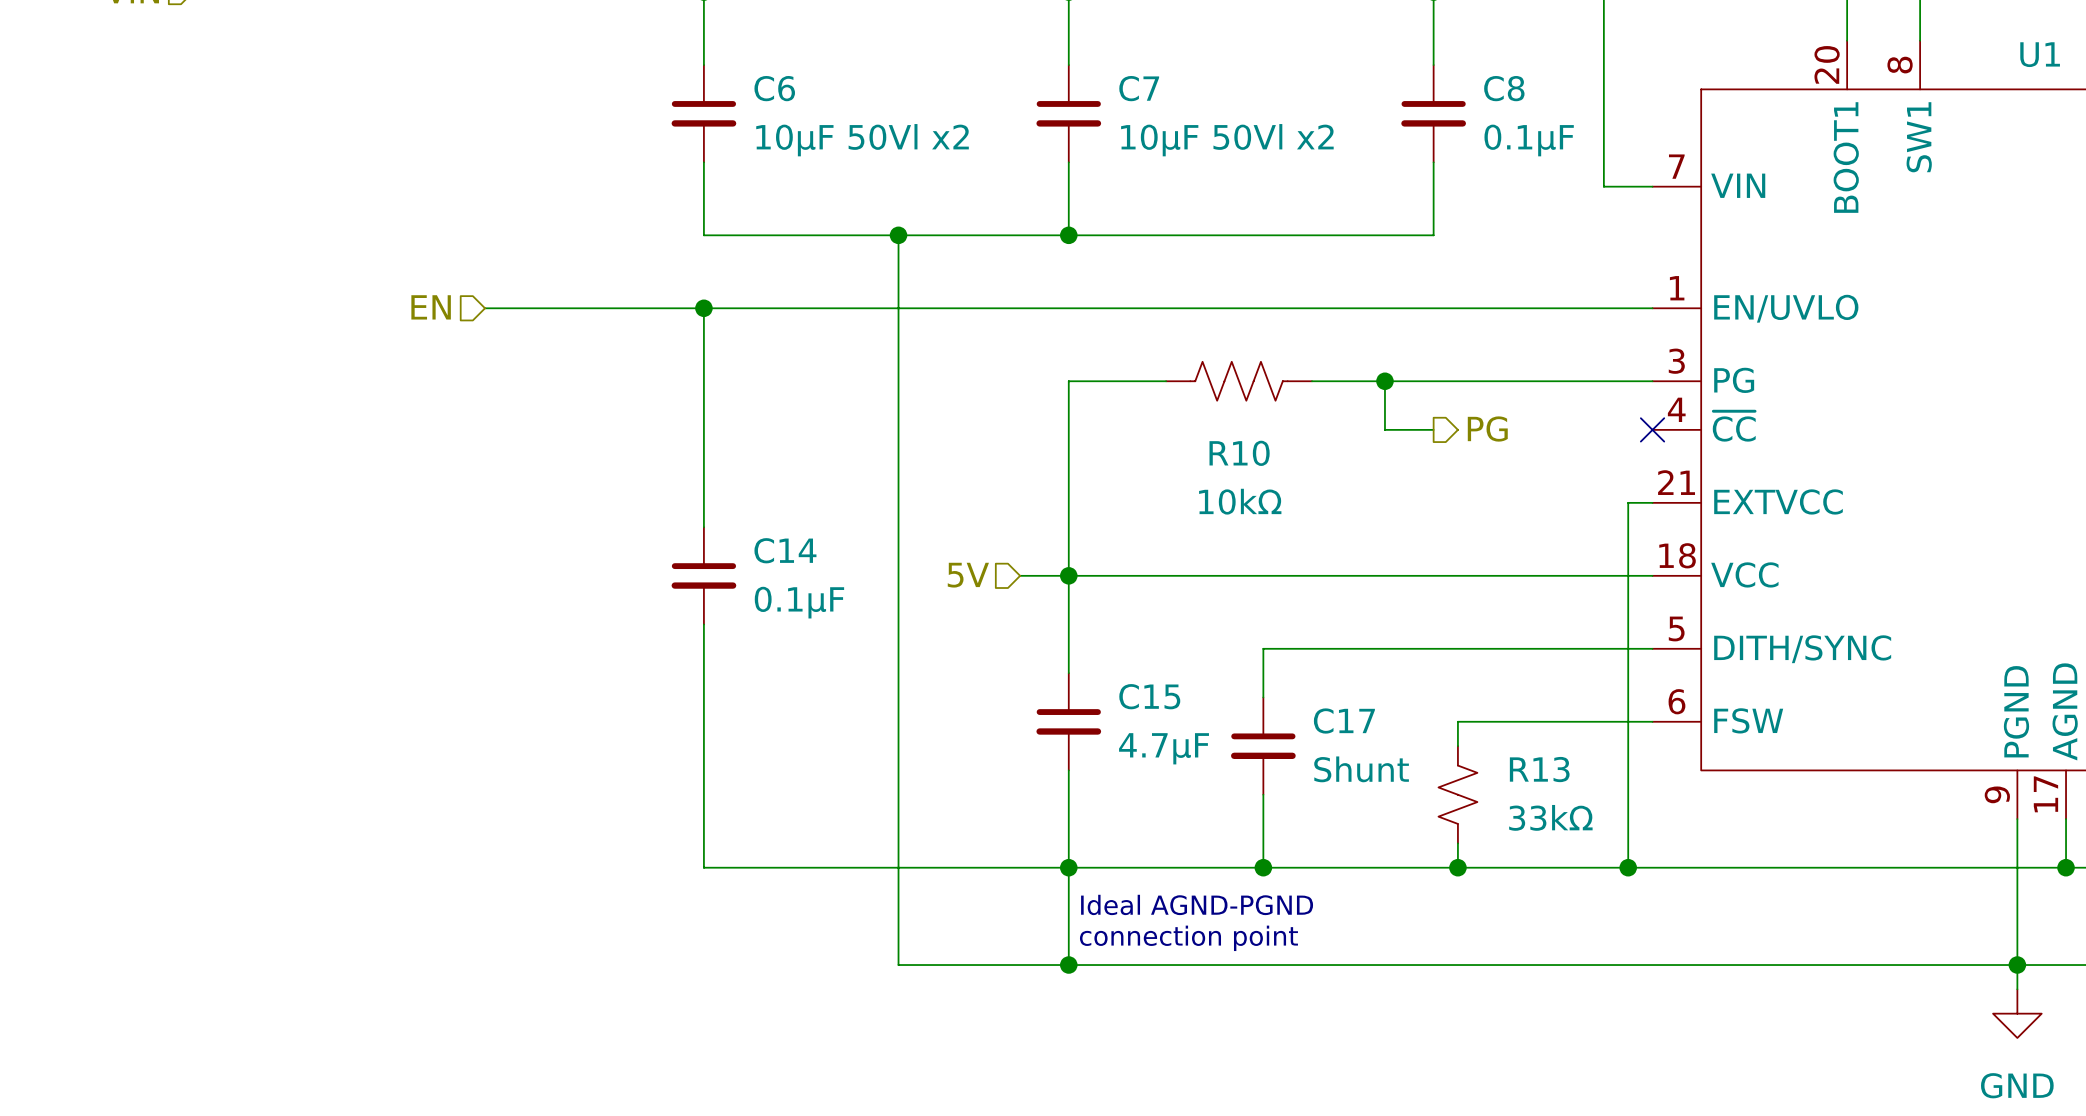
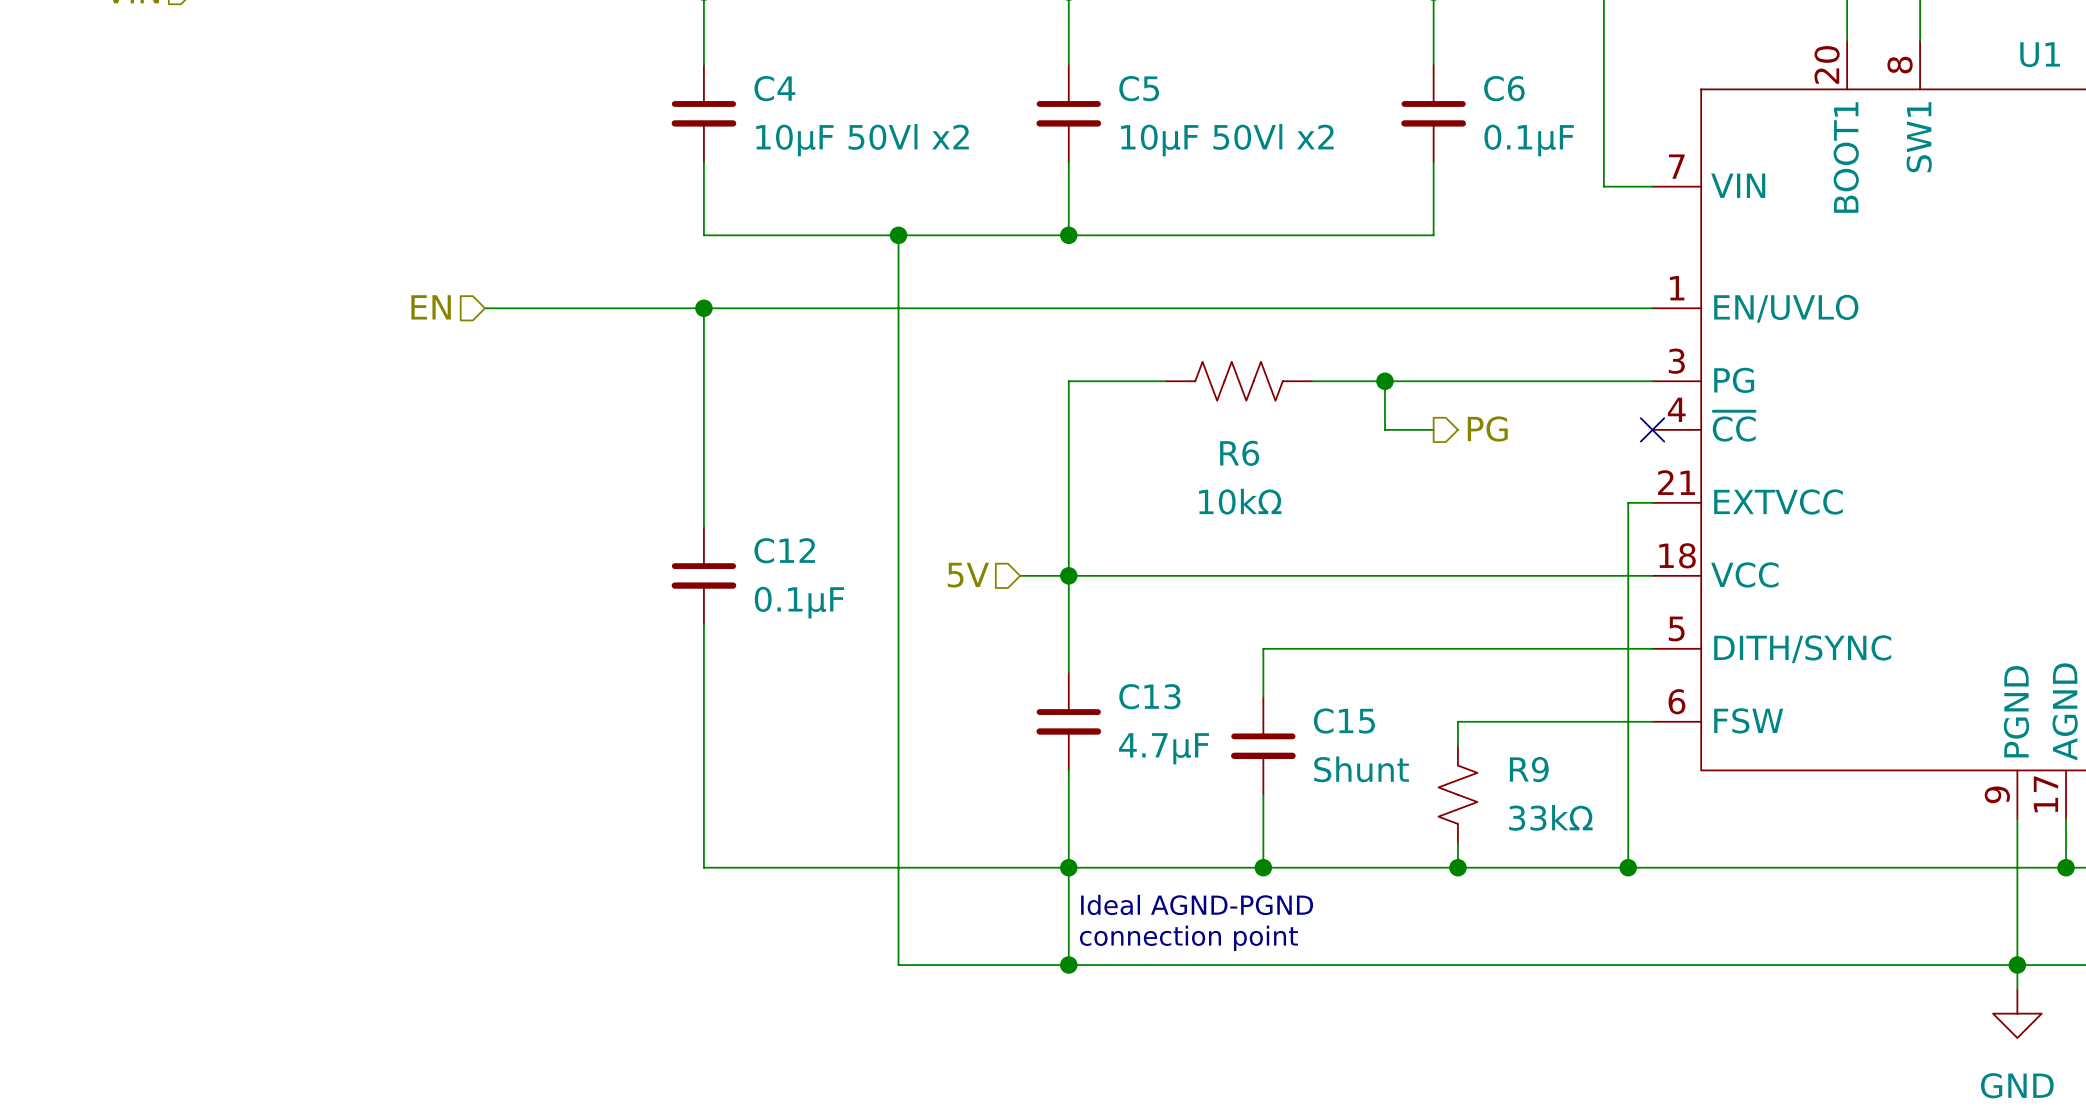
C6 name: C6 (774, 88) -> C4 (774, 88)
C7 name: C7 (1139, 88) -> C5 (1139, 88)
C8 name: C8 (1504, 88) -> C6 (1504, 88)
R10 name: R10 (1239, 453) -> R6 (1239, 453)
C14 name: C14 (785, 550) -> C12 (784, 550)
C15 name: C15 (1149, 696) -> C13 (1149, 696)
C17 name: C17 (1344, 721) -> C15 (1344, 721)
R13 name: R13 (1539, 769) -> R9 (1529, 769)

